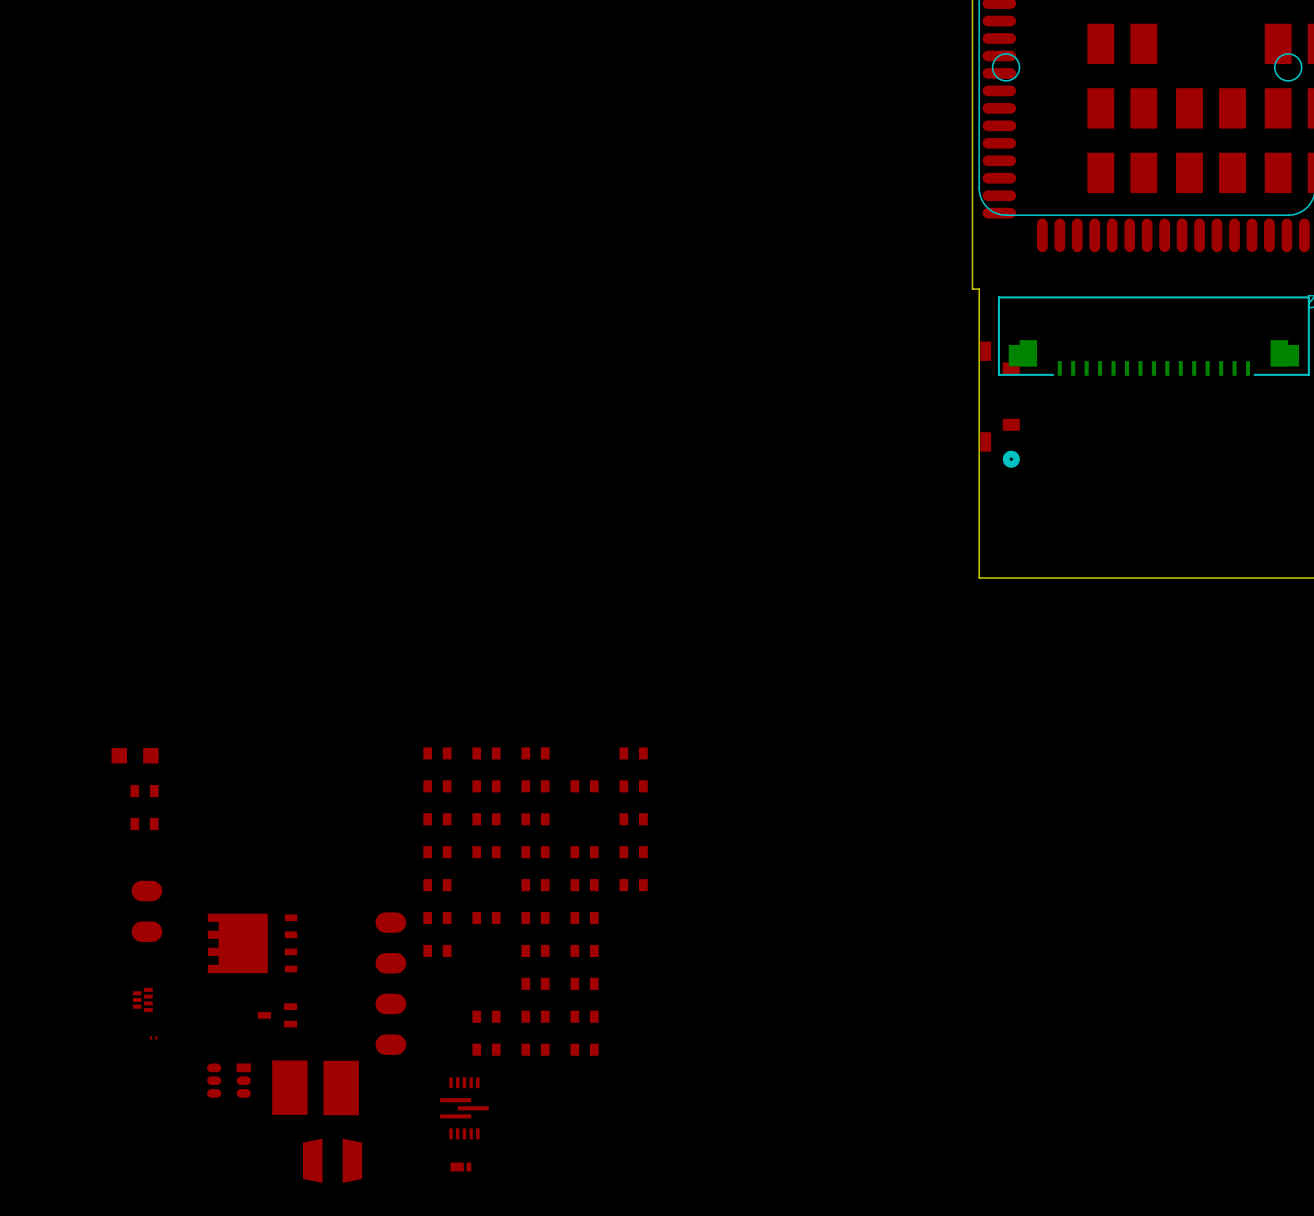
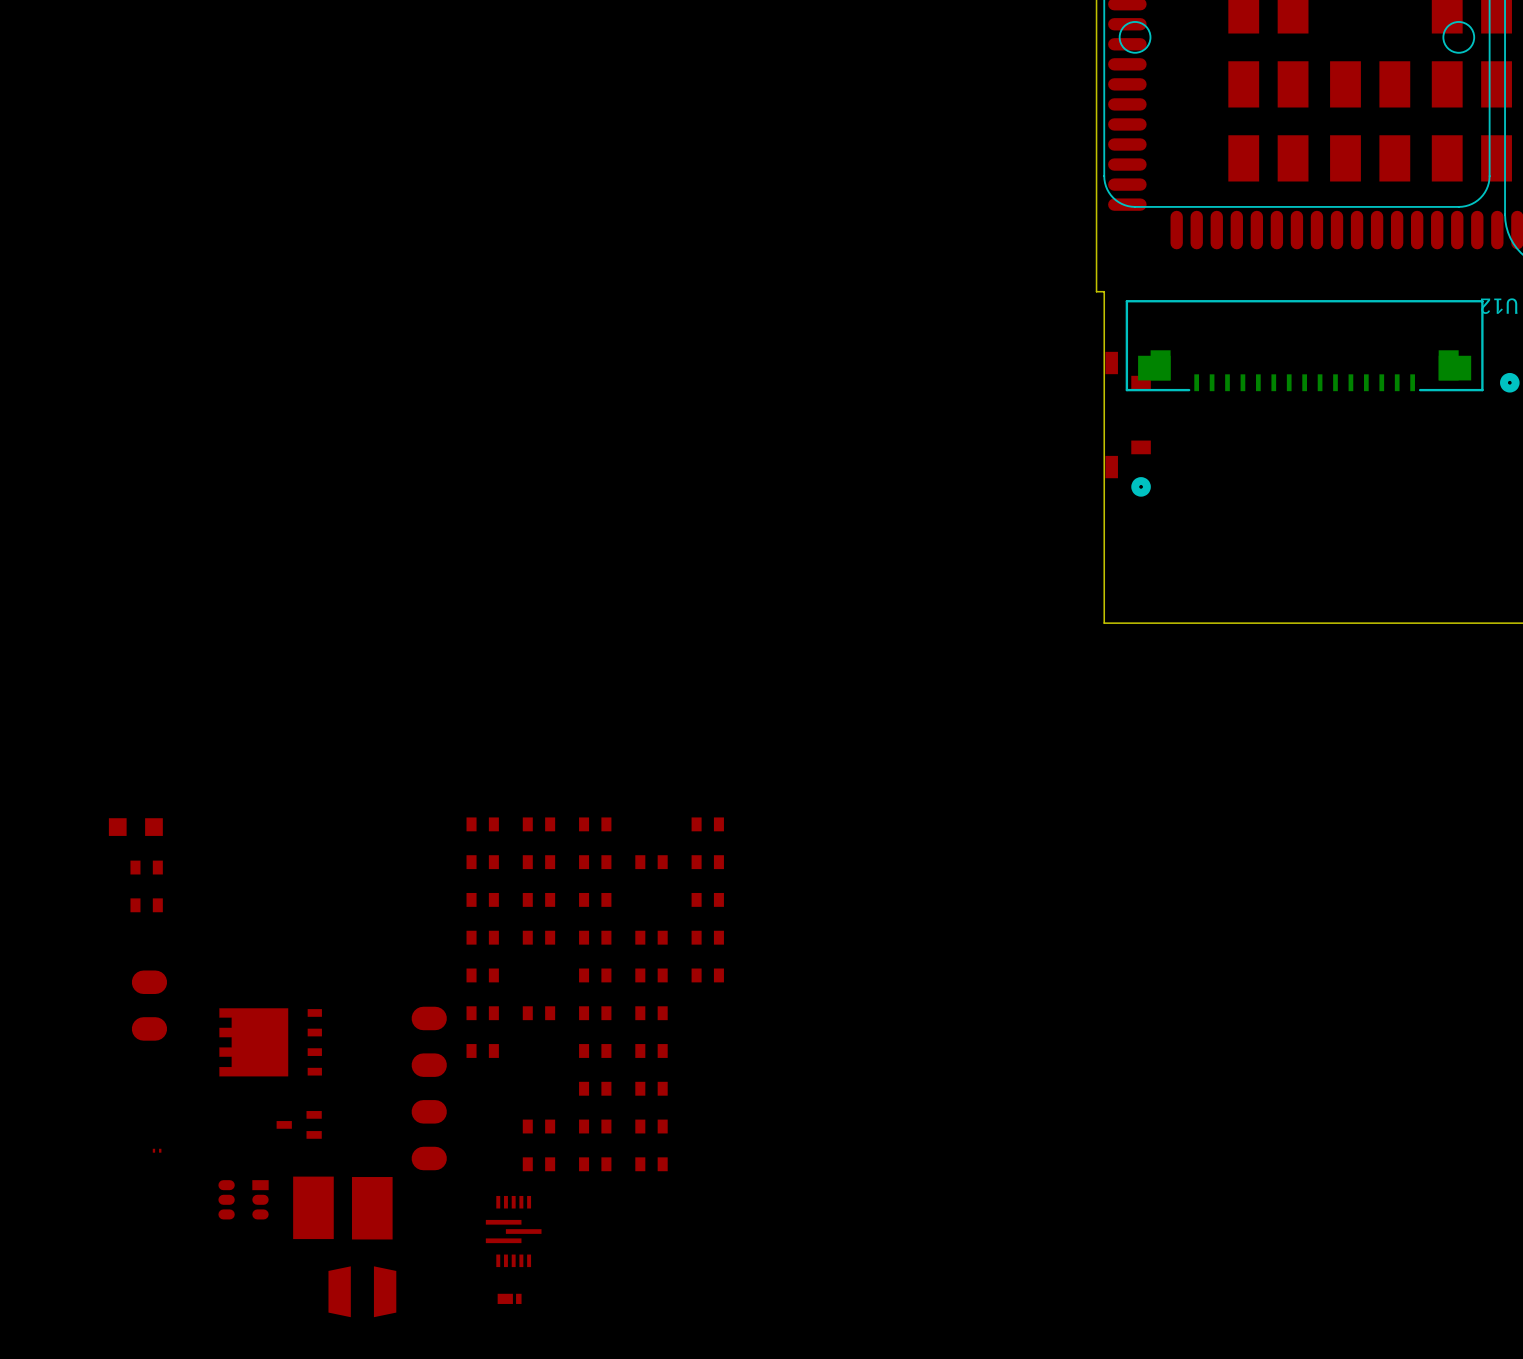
part: (142, 999) -> none

